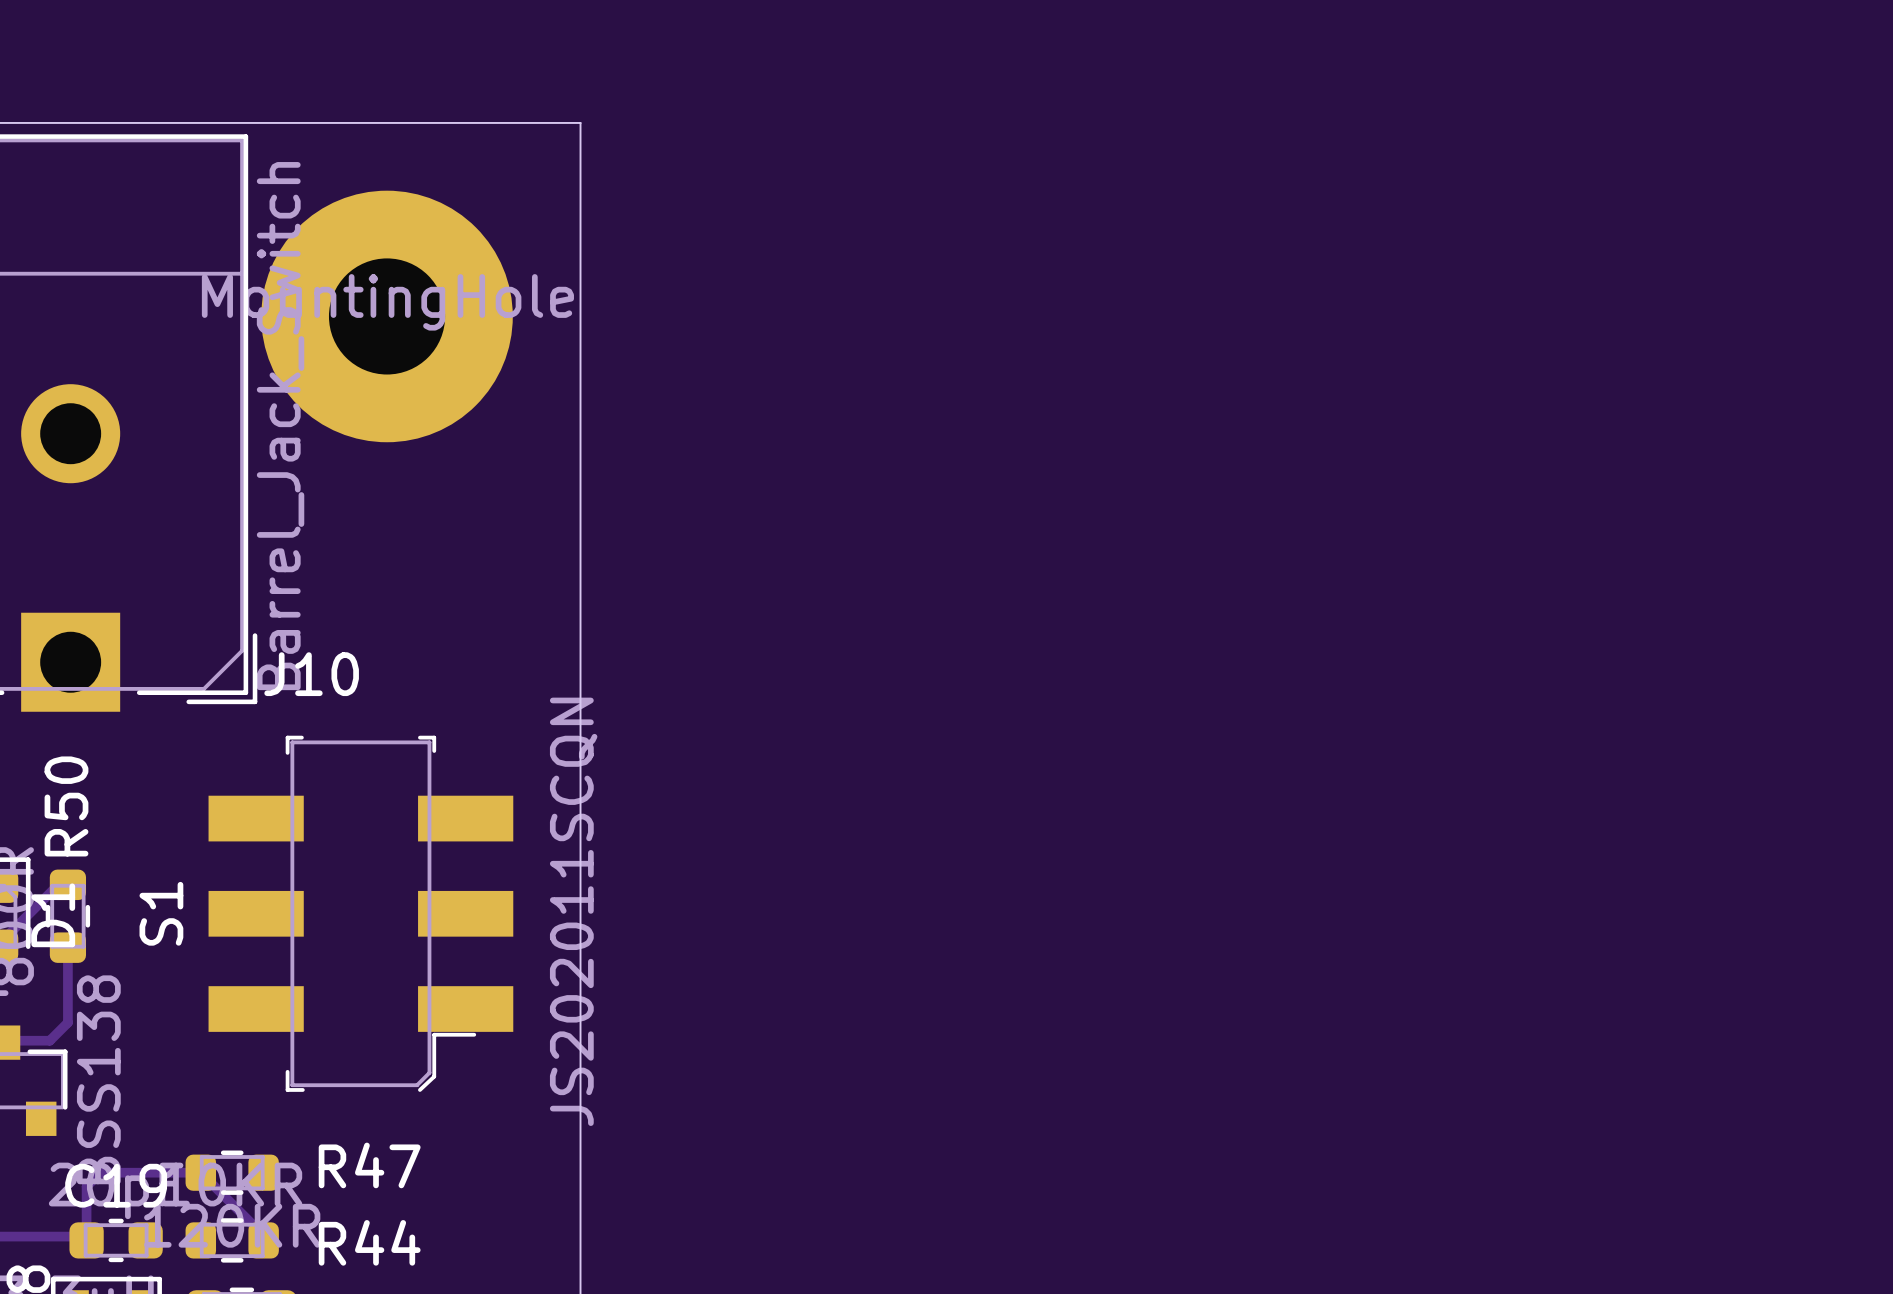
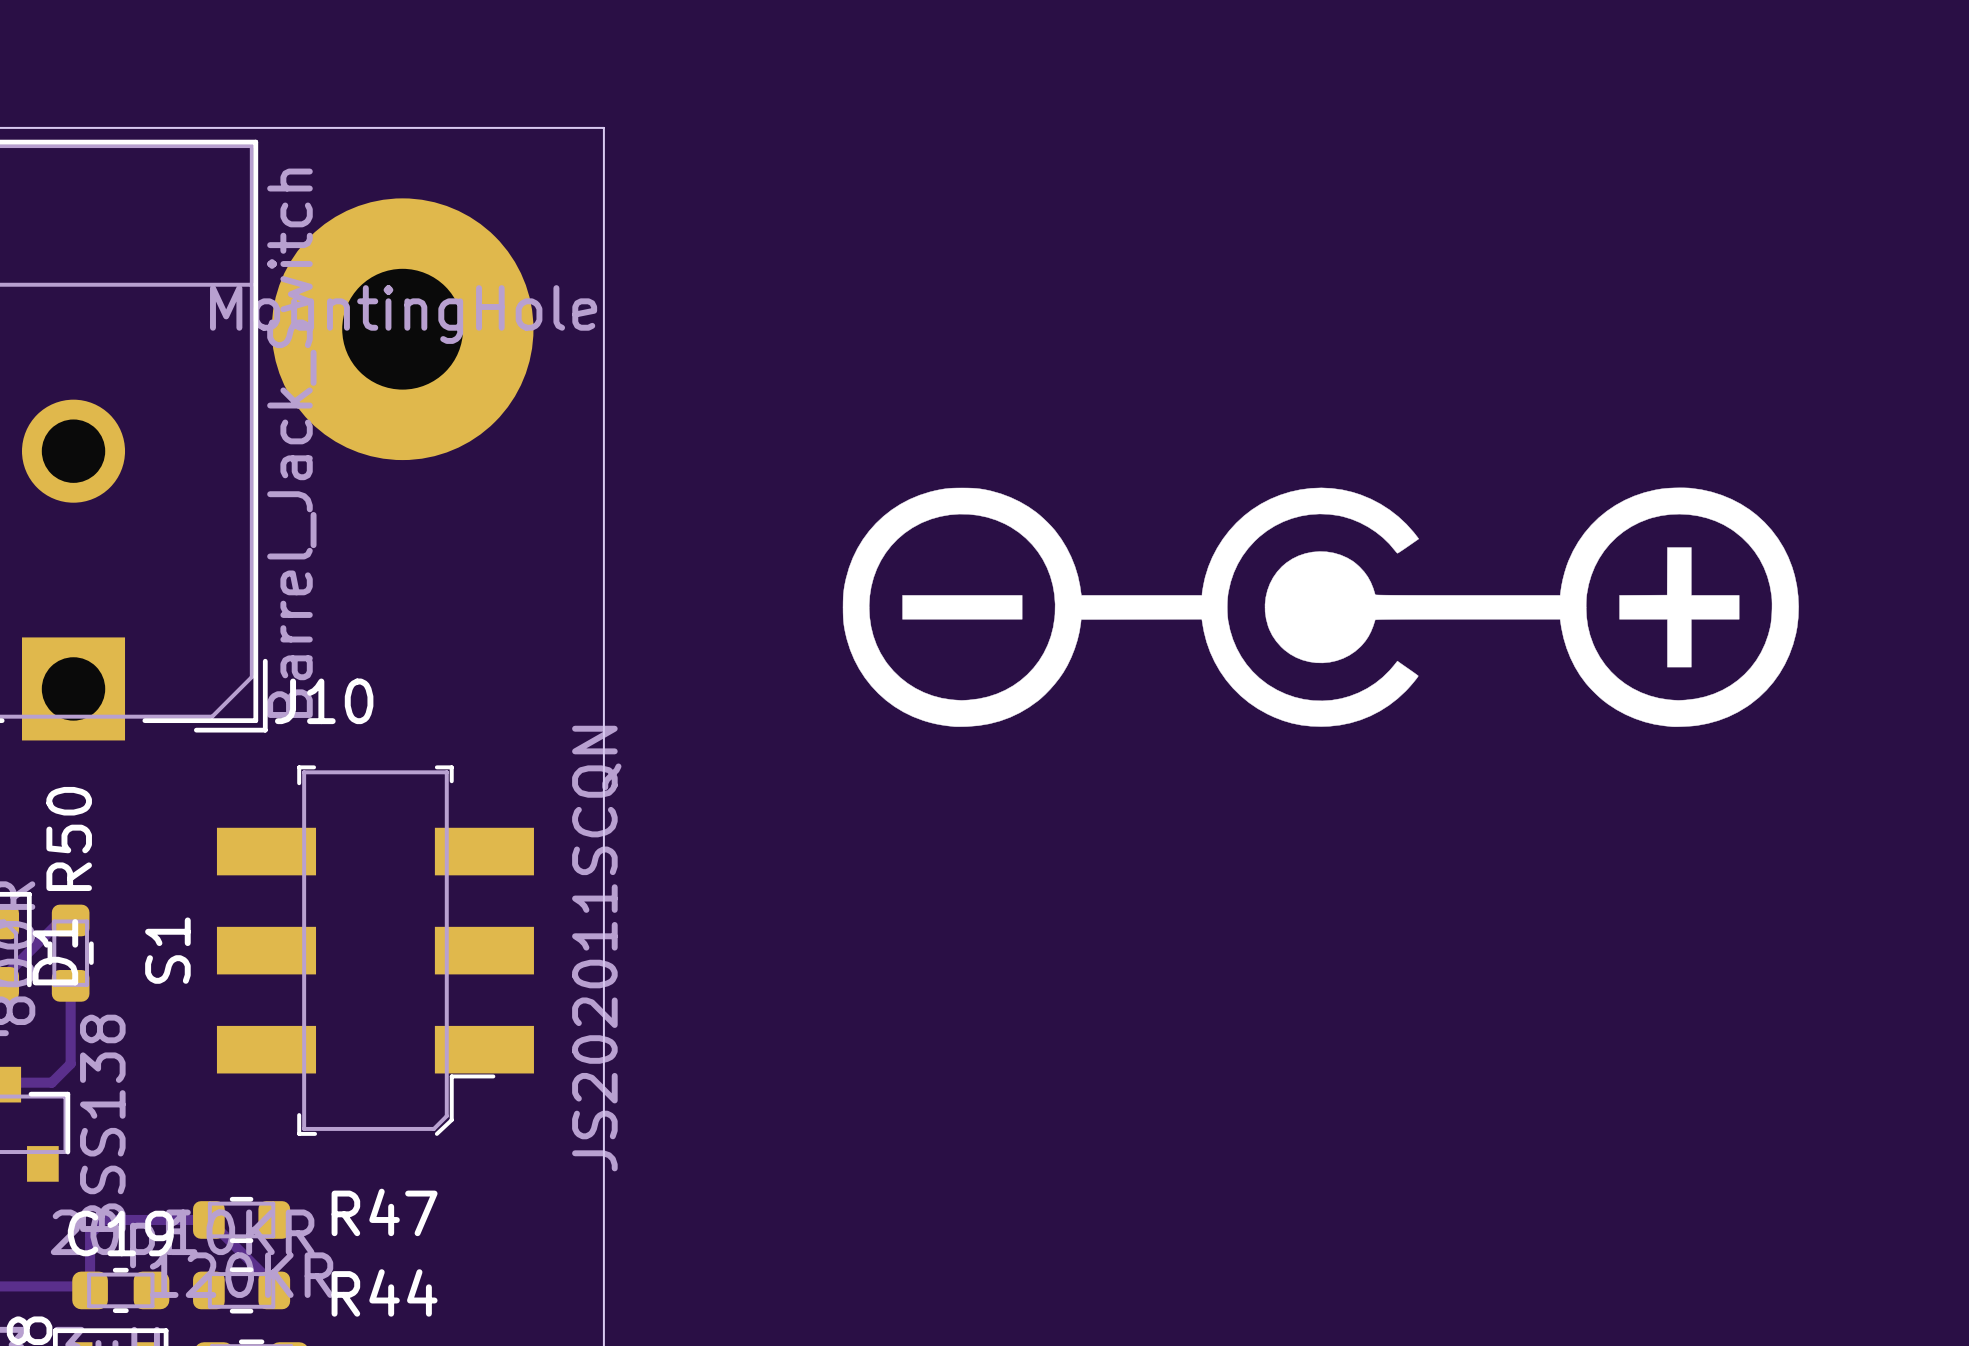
drawing: none -> [842, 487, 1799, 727]

